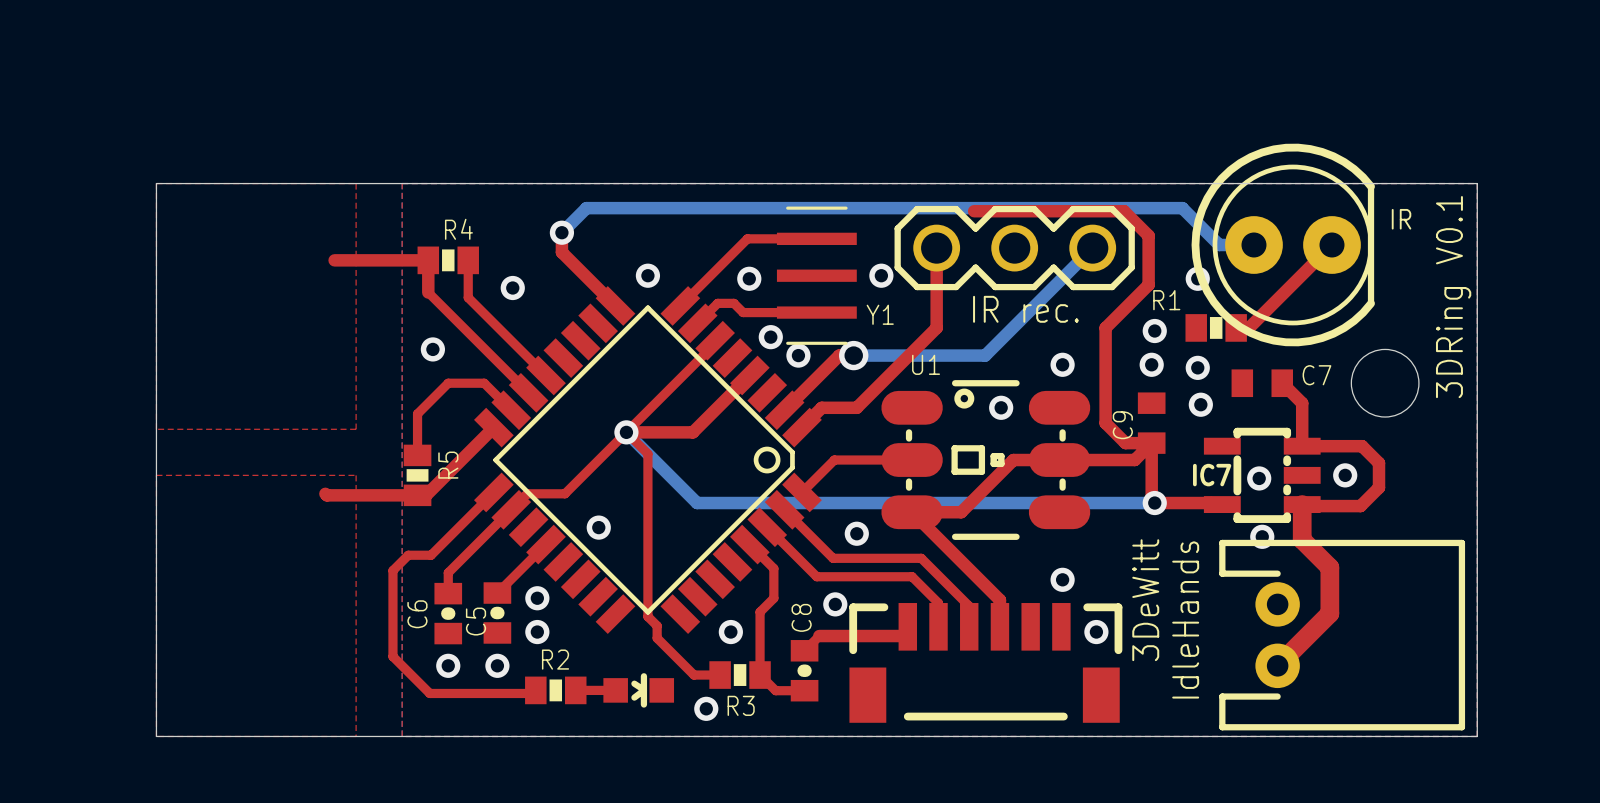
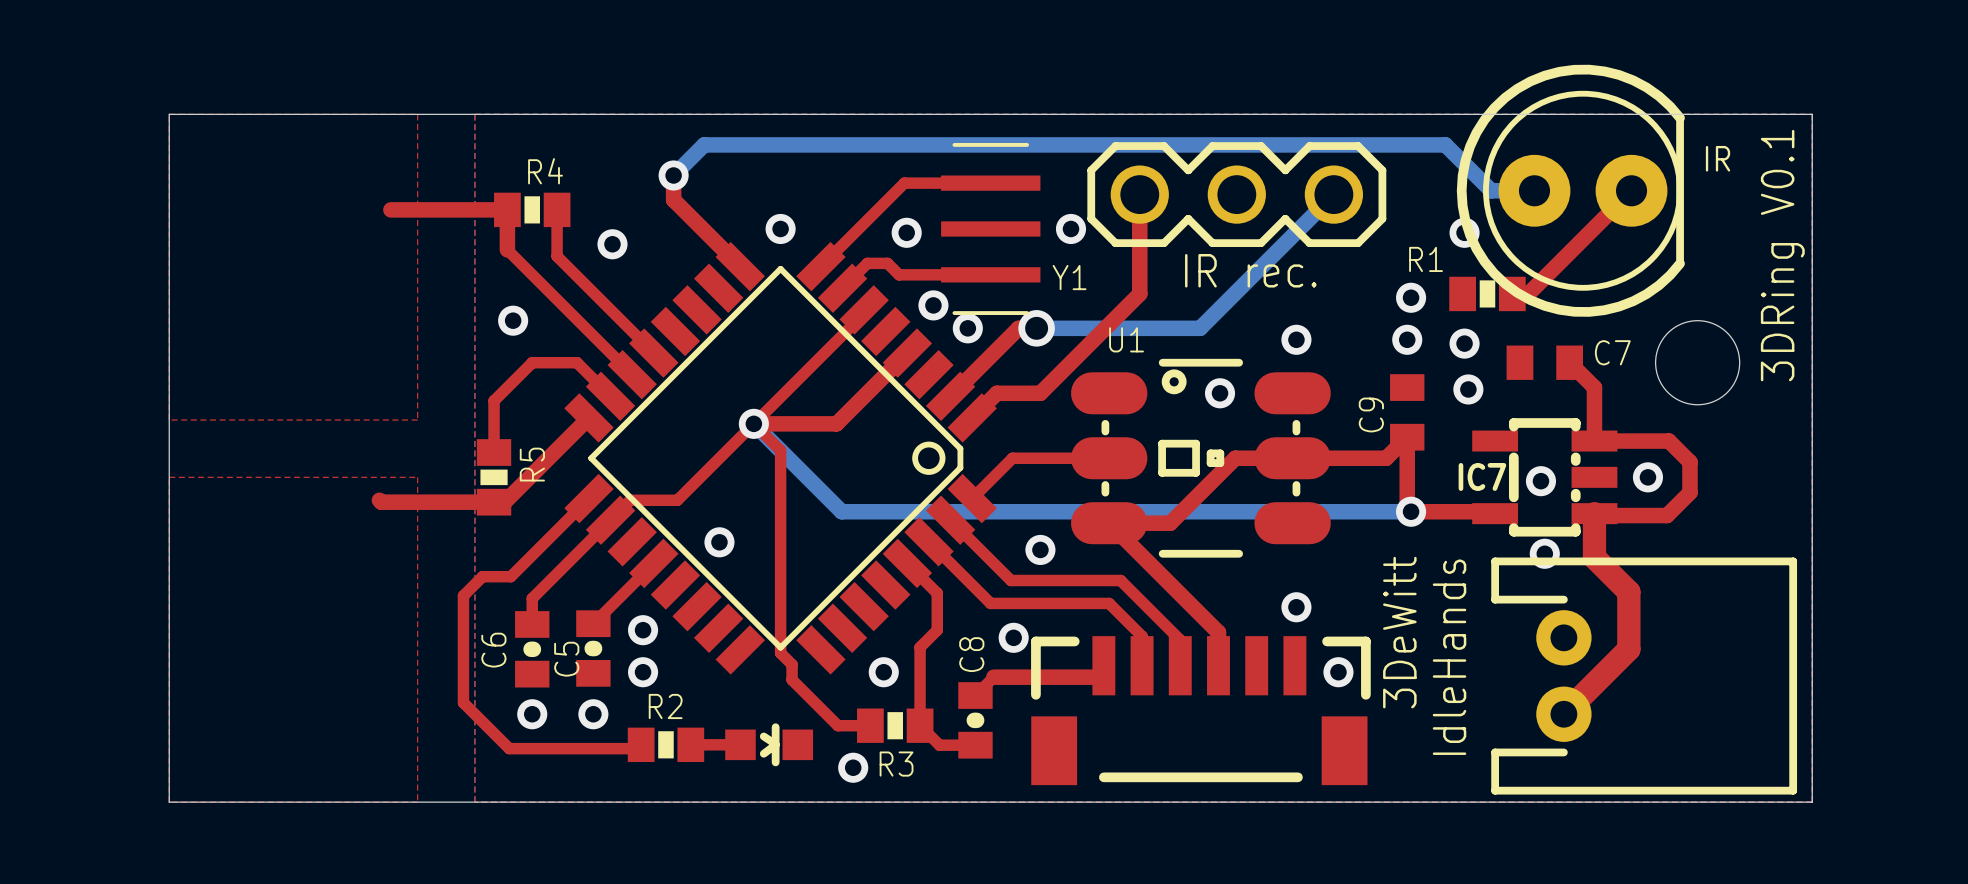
top track: (974, 211) (1124, 211) (1148, 235) (1148, 284) (1105, 327) (1105, 423) (1125, 443) (1151, 443) -> none

